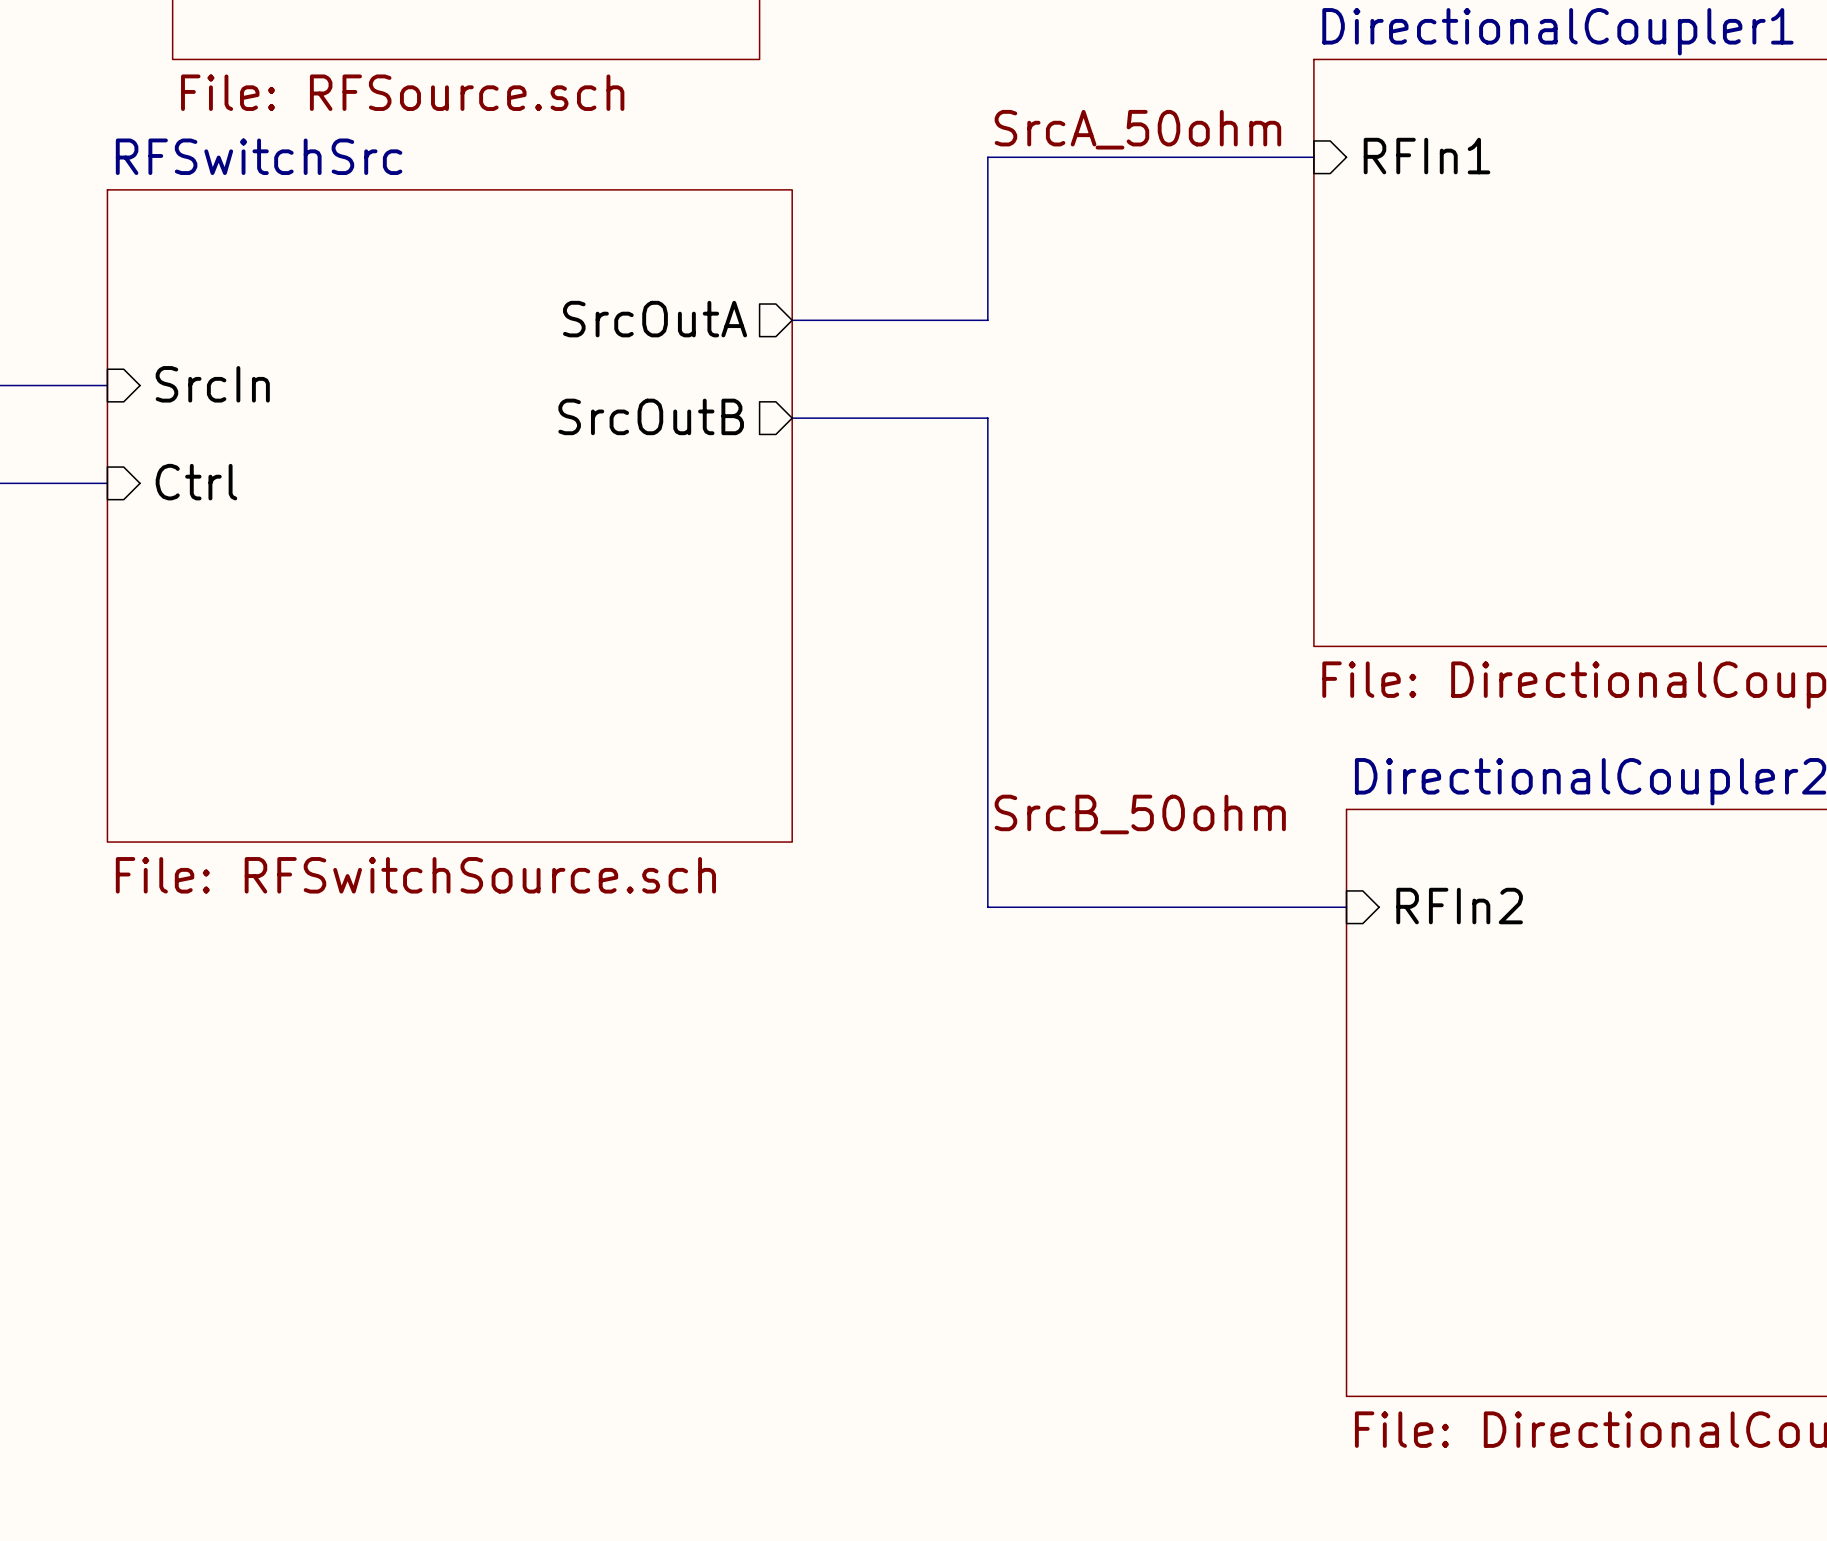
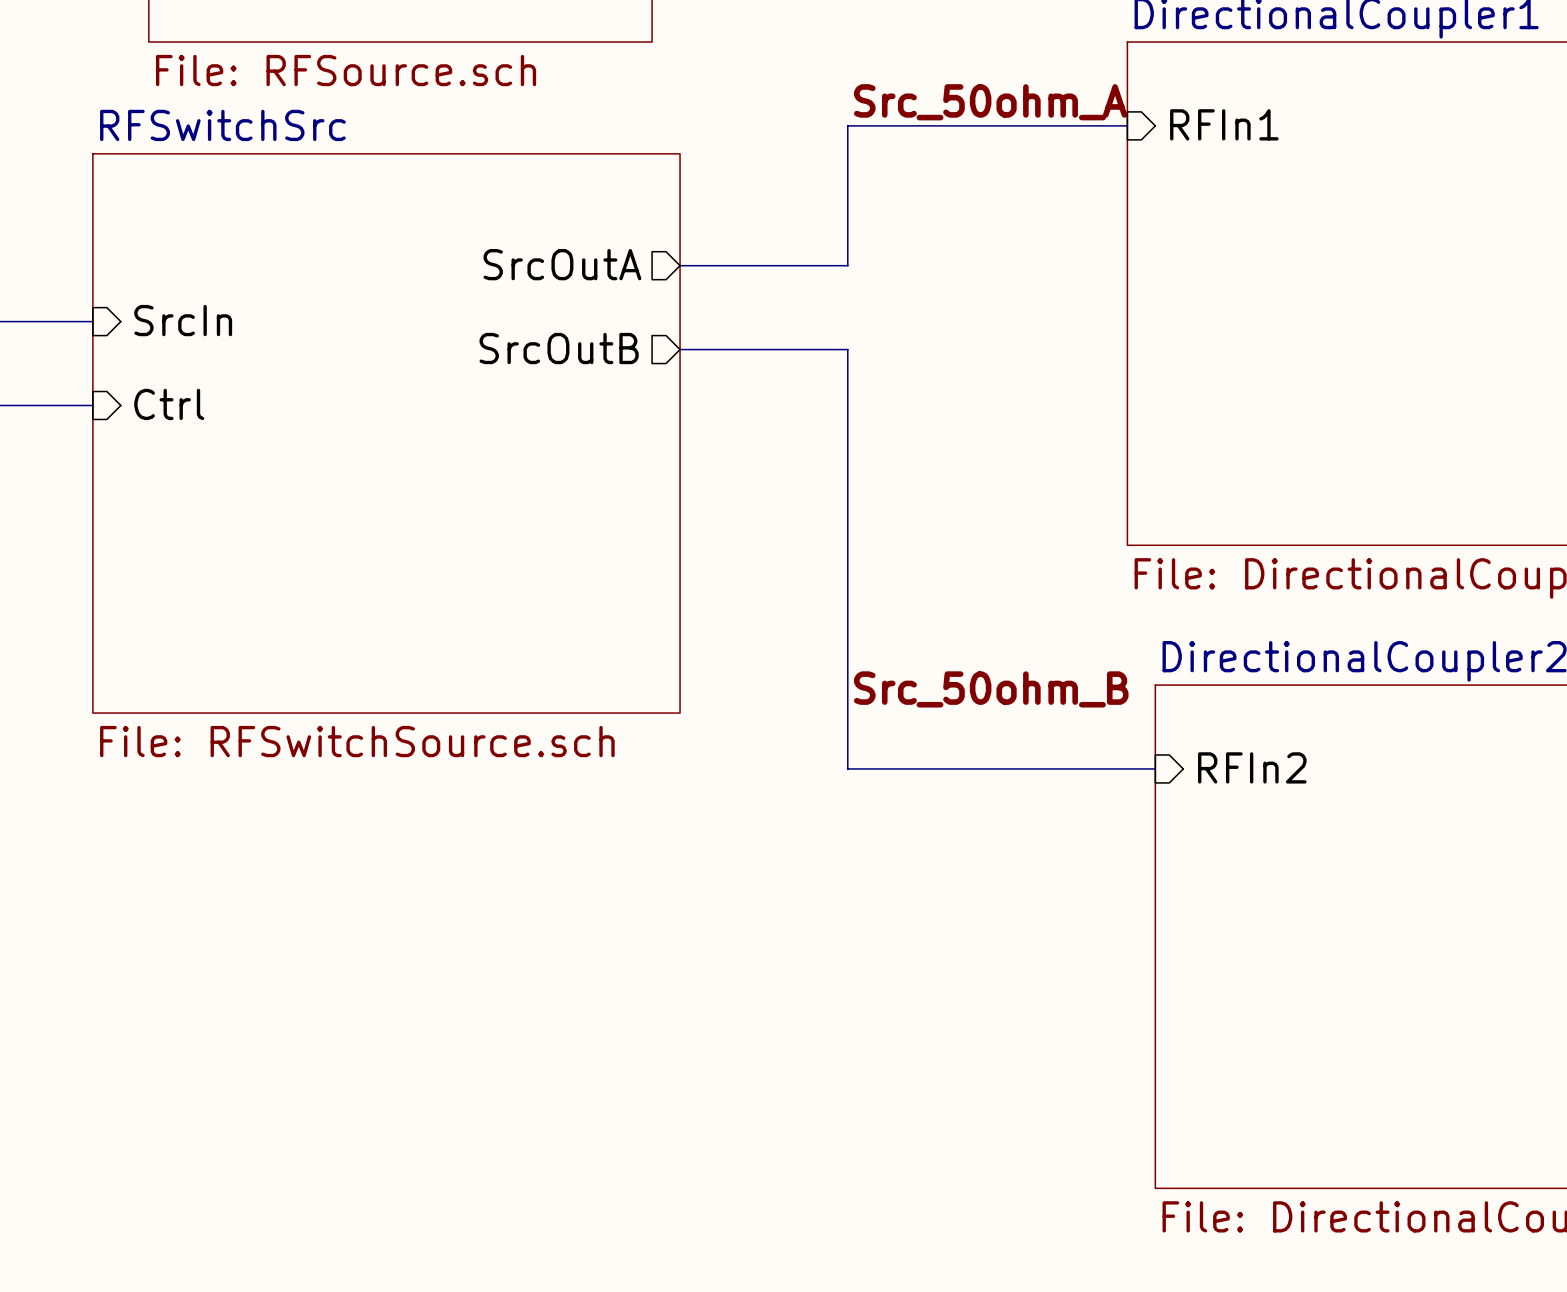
label: SrcA_50ohm (1137, 129) -> Src_50ohm_A (990, 102)
label: SrcB_50ohm (1140, 814) -> Src_50ohm_B (991, 689)

